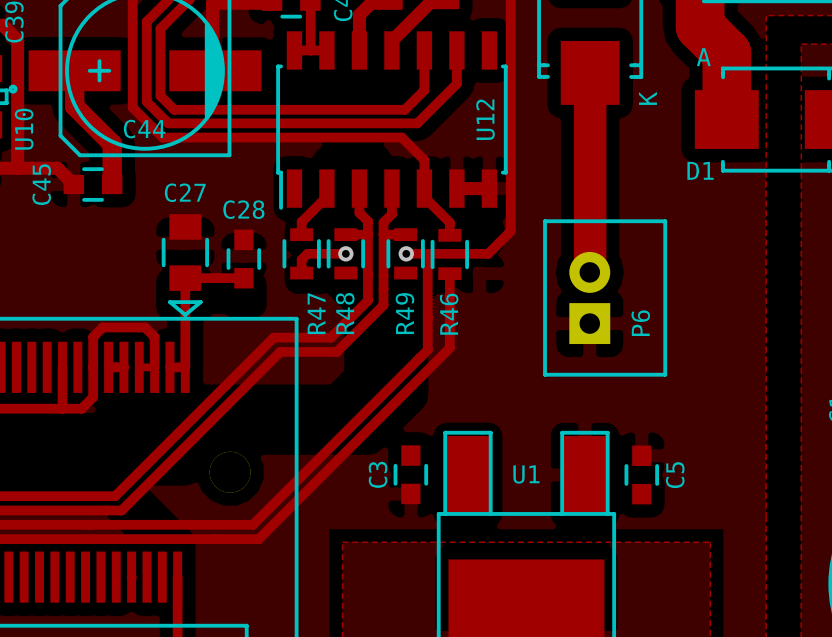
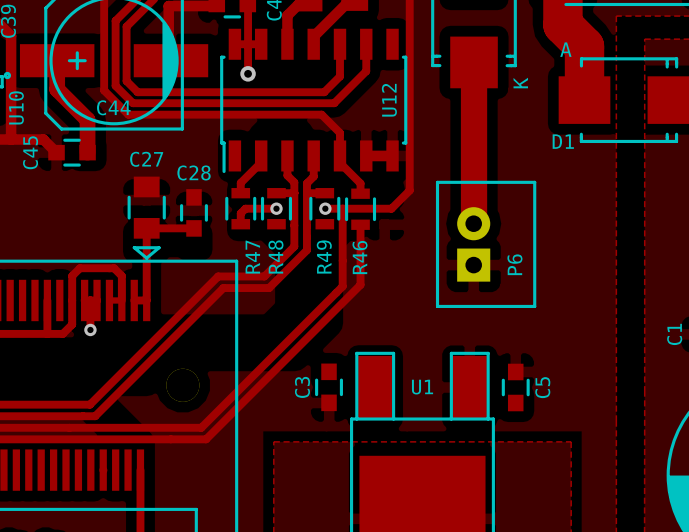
track: none -> (248, 44) (248, 73)
via: none -> (248, 73)
track: none -> (90, 300) (90, 329)
via: none -> (90, 329)

